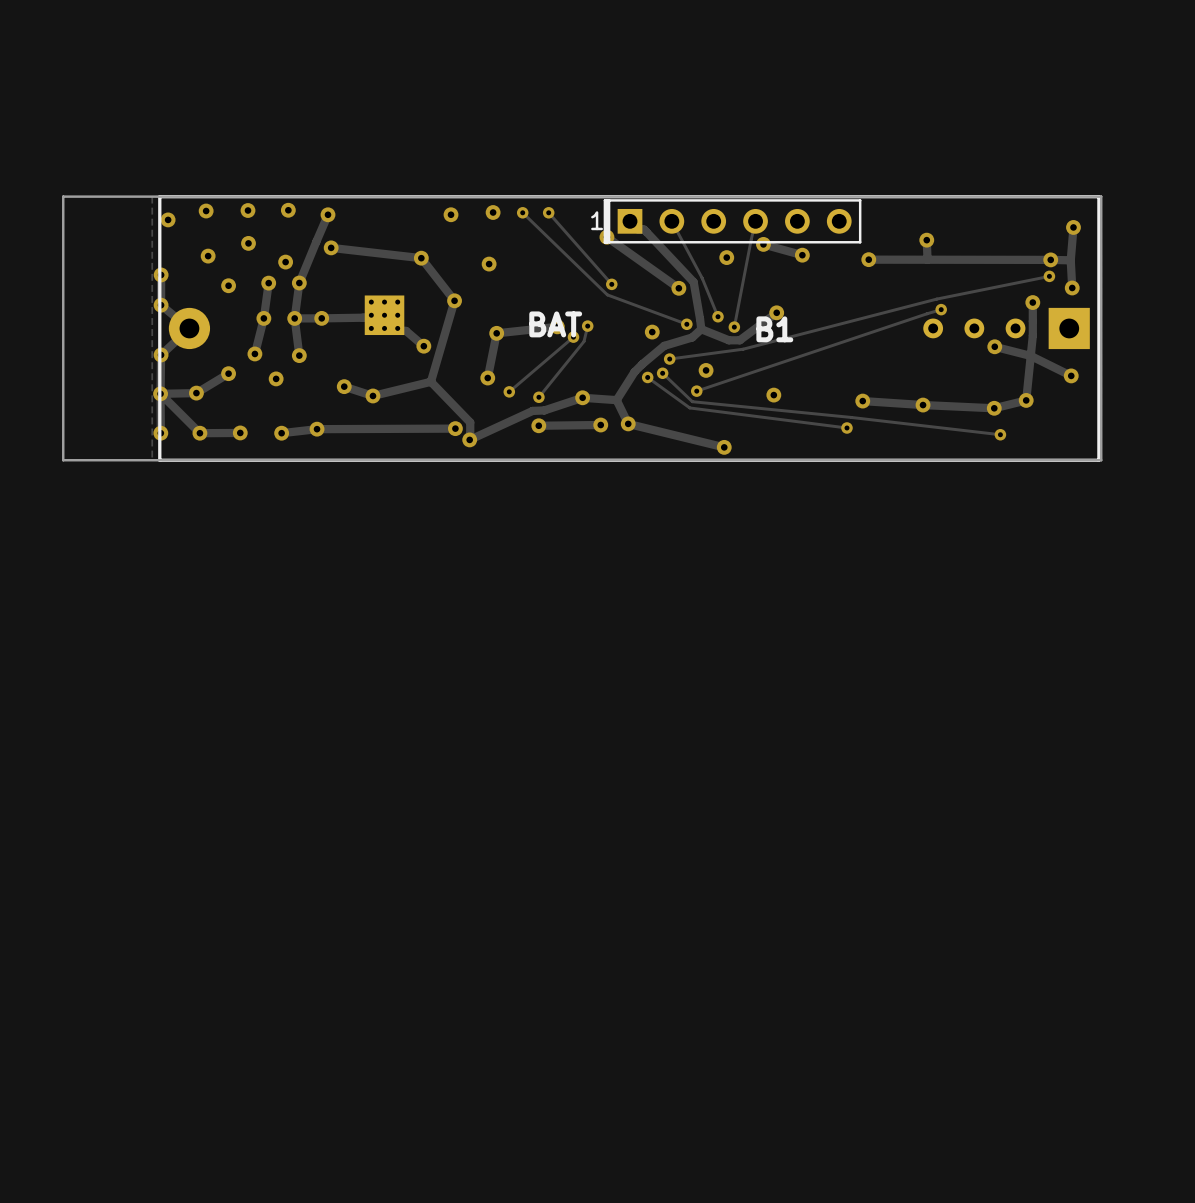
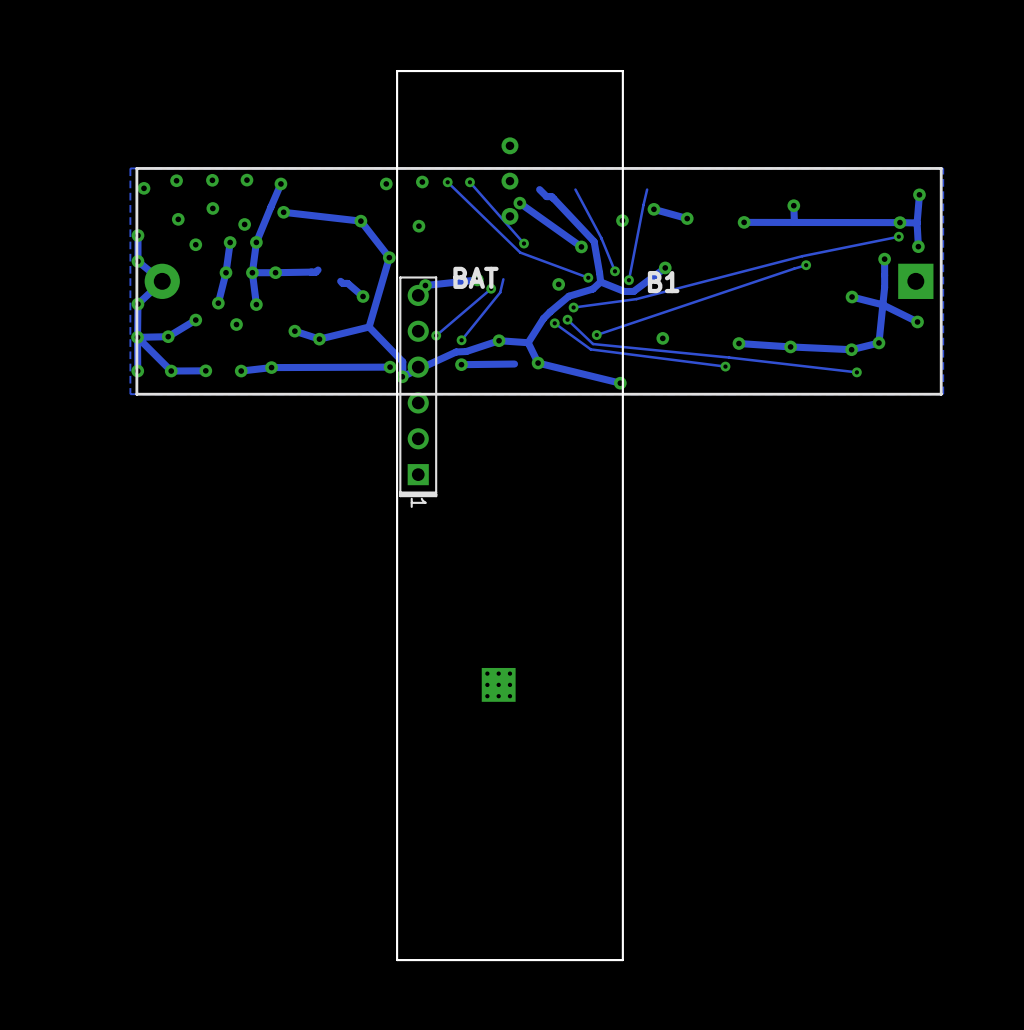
board edge: none -> (622, 71) (397, 71) (397, 960) (622, 960) (622, 71)
board edge: (1101, 196) (1101, 460) (63, 460) (63, 196) (1101, 196) -> none
part rotation: 0° (732, 221) -> 90° counterclockwise (418, 386)
part position: (732, 221) -> (418, 386)
part: (384, 315) -> none
via: (587, 326) -> none
part rotation: 0° (974, 328) -> 90° clockwise (509, 181)
part position: (974, 328) -> (509, 181)
track: (496, 333) (487, 378) -> none
via: (706, 370) -> none
via: (487, 378) -> none
via: (600, 425) -> none
part: none -> (498, 684)

